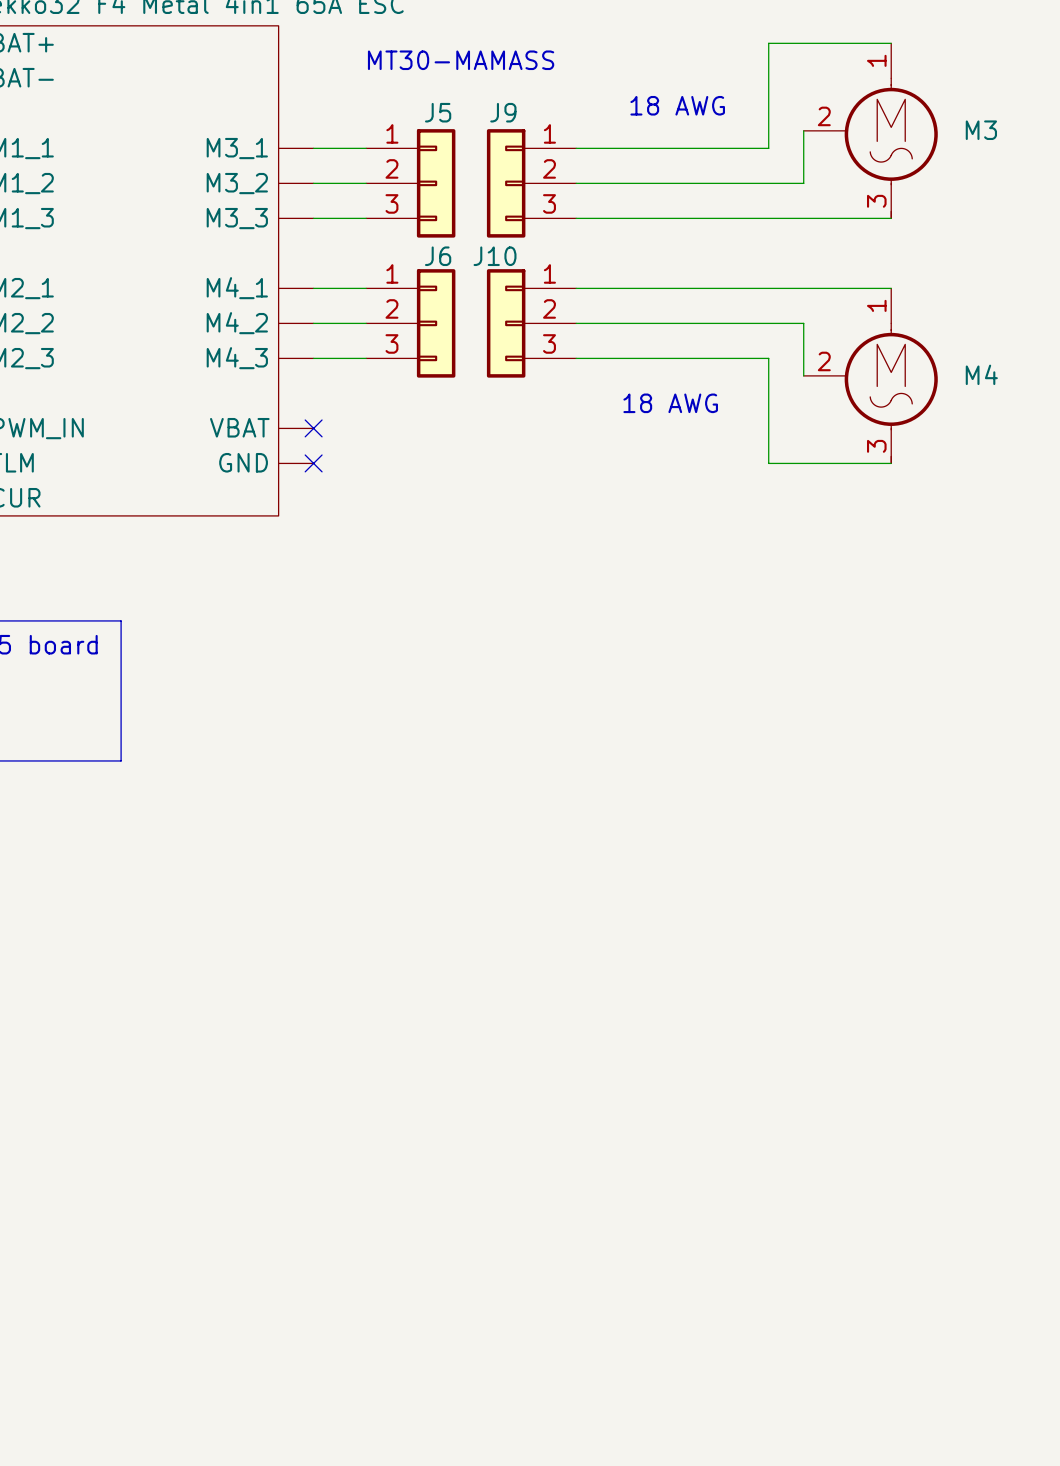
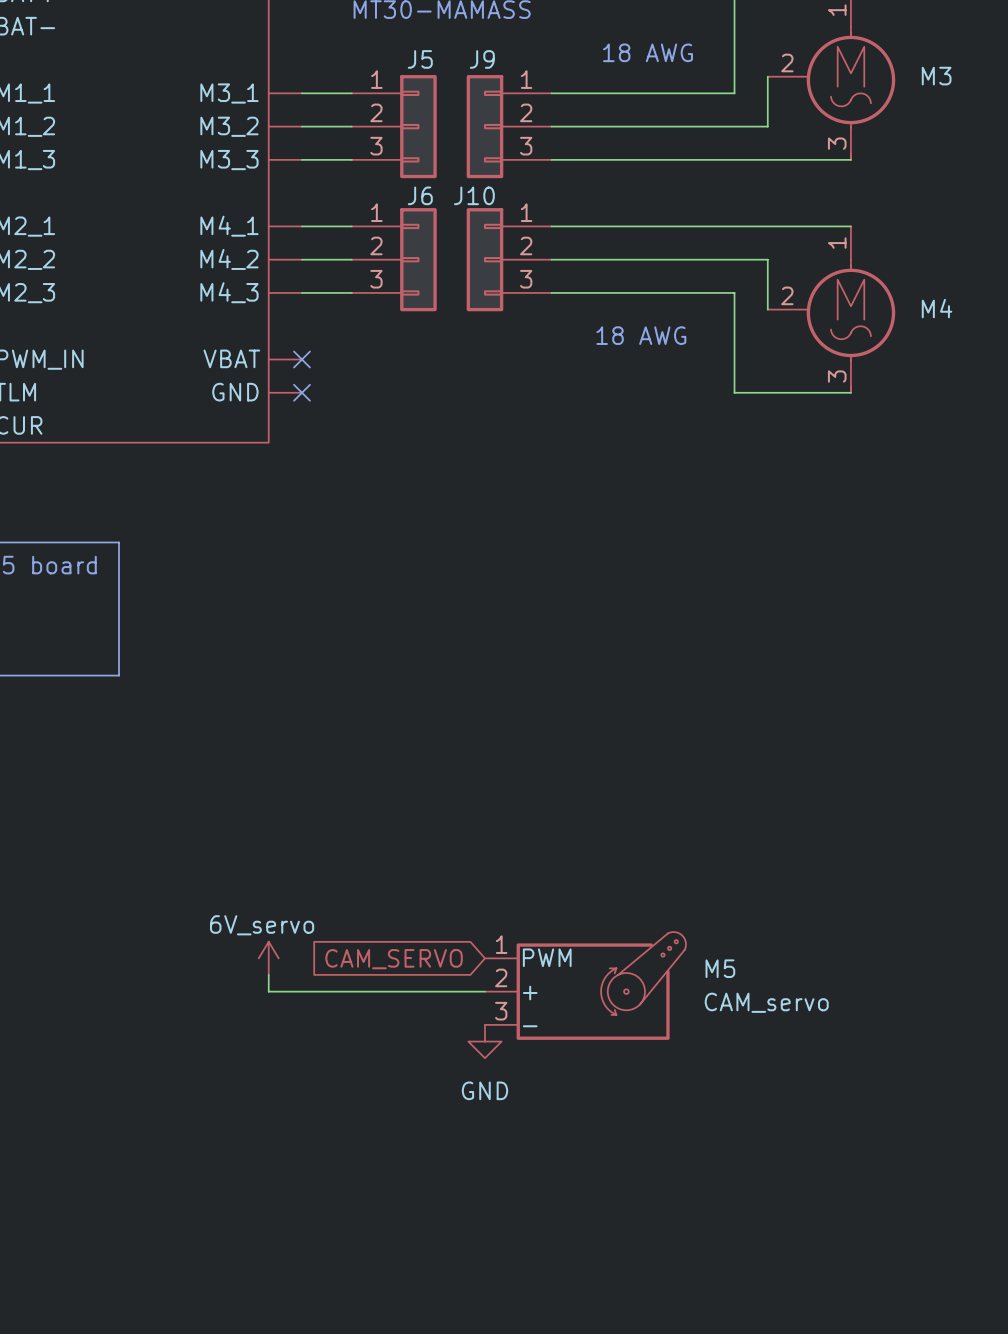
power symbol: none -> 6V_servo (268, 958)
global label: none -> CAM_SERVO (394, 959)
wire: none -> (268, 975) (268, 991) (484, 991)
M5: none -> CAM_servo (585, 985)
power symbol: none -> GND (484, 1041)

